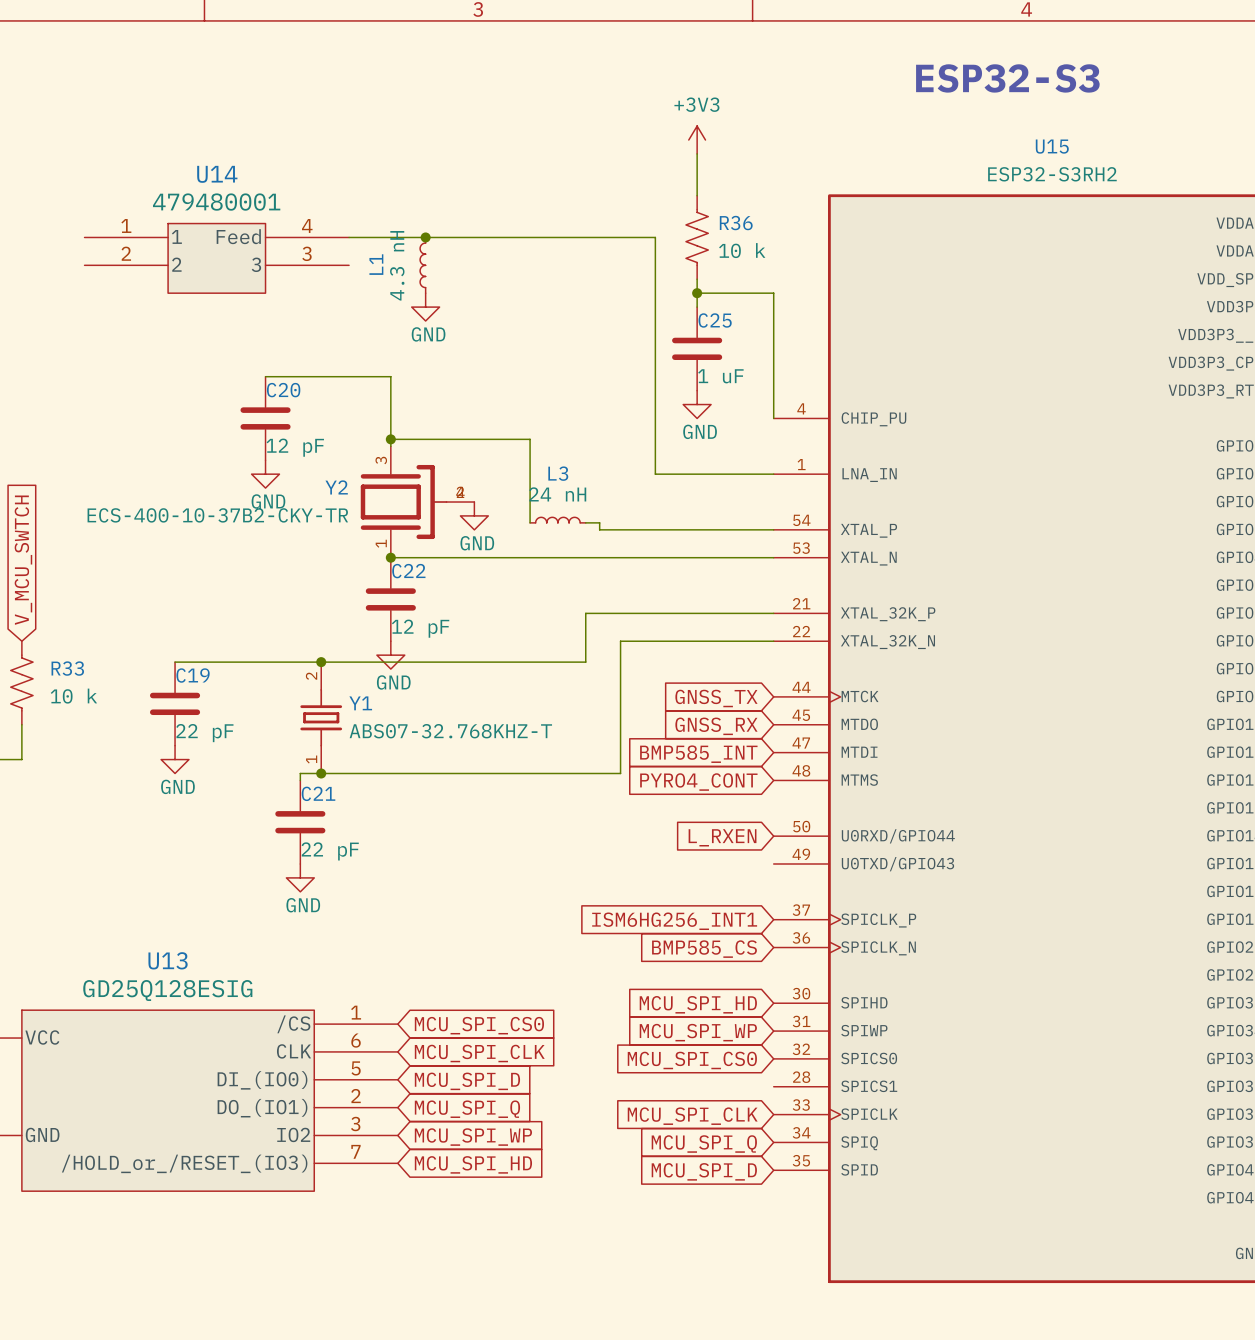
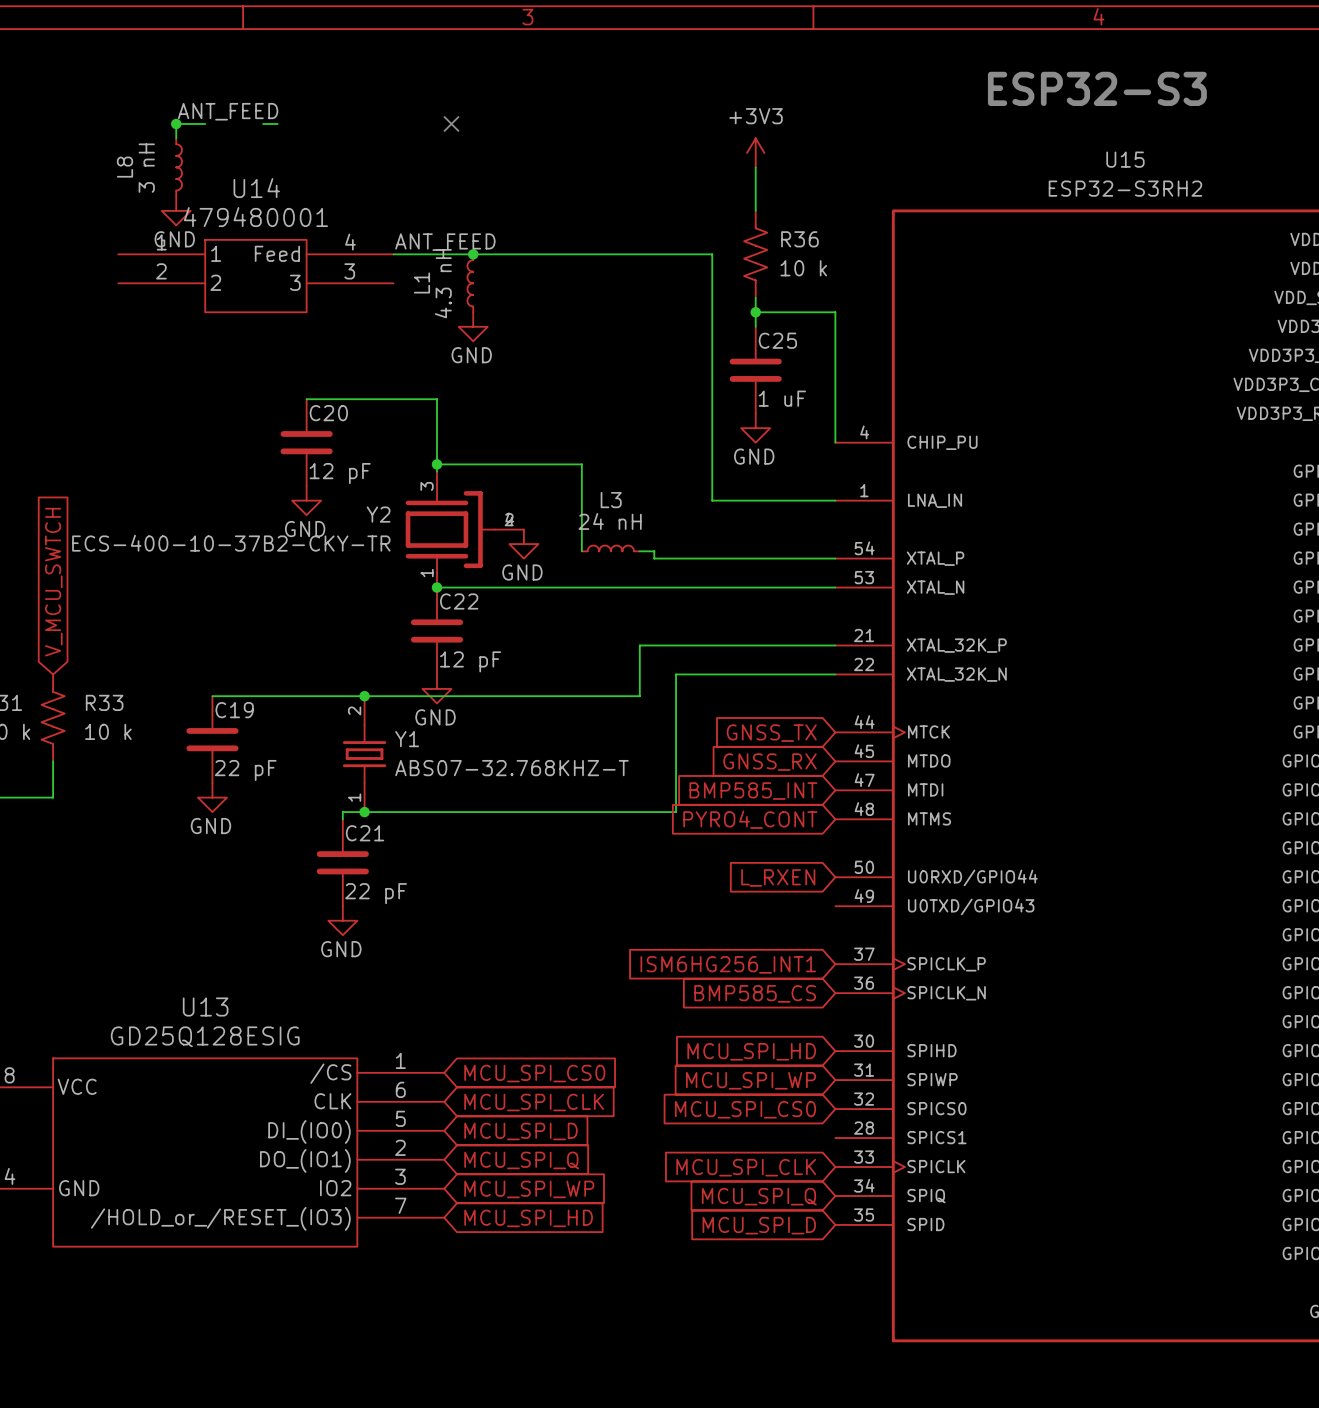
label: none -> ANT_FEED (228, 111)
junction: none -> (176, 123)
wire: none -> (205, 123) (176, 123) (176, 138)
wire: none -> (263, 123) (277, 123)
no-connect mark: none -> (451, 123)
L8: none -> 3 nH (179, 167)
power symbol: none -> GND (176, 210)
label: none -> ANT_FEED (445, 242)

